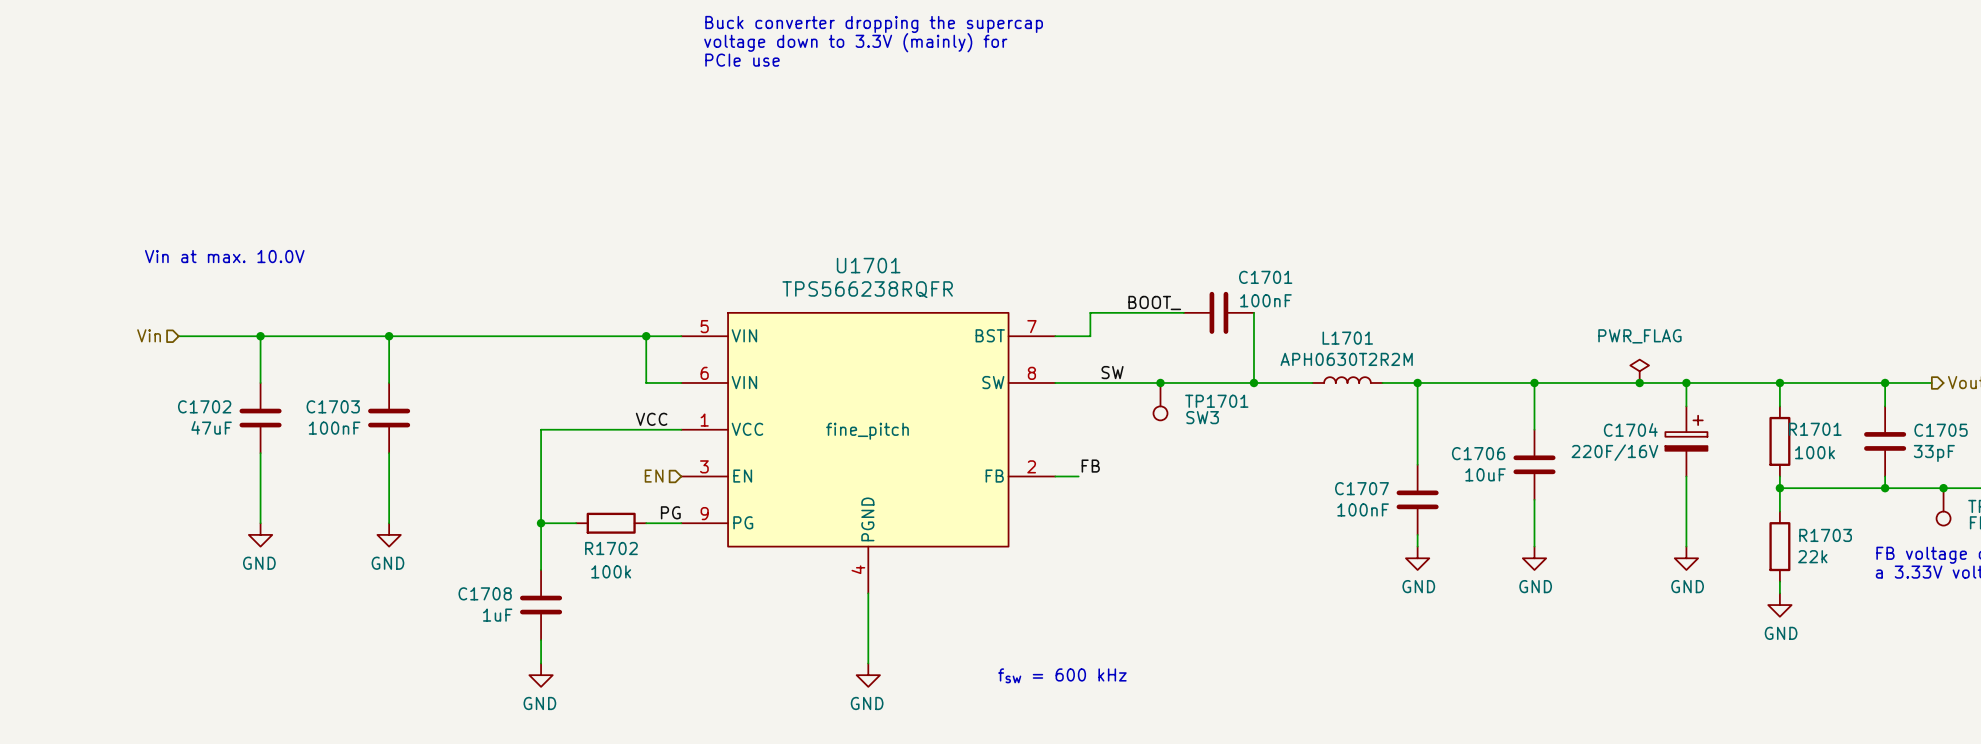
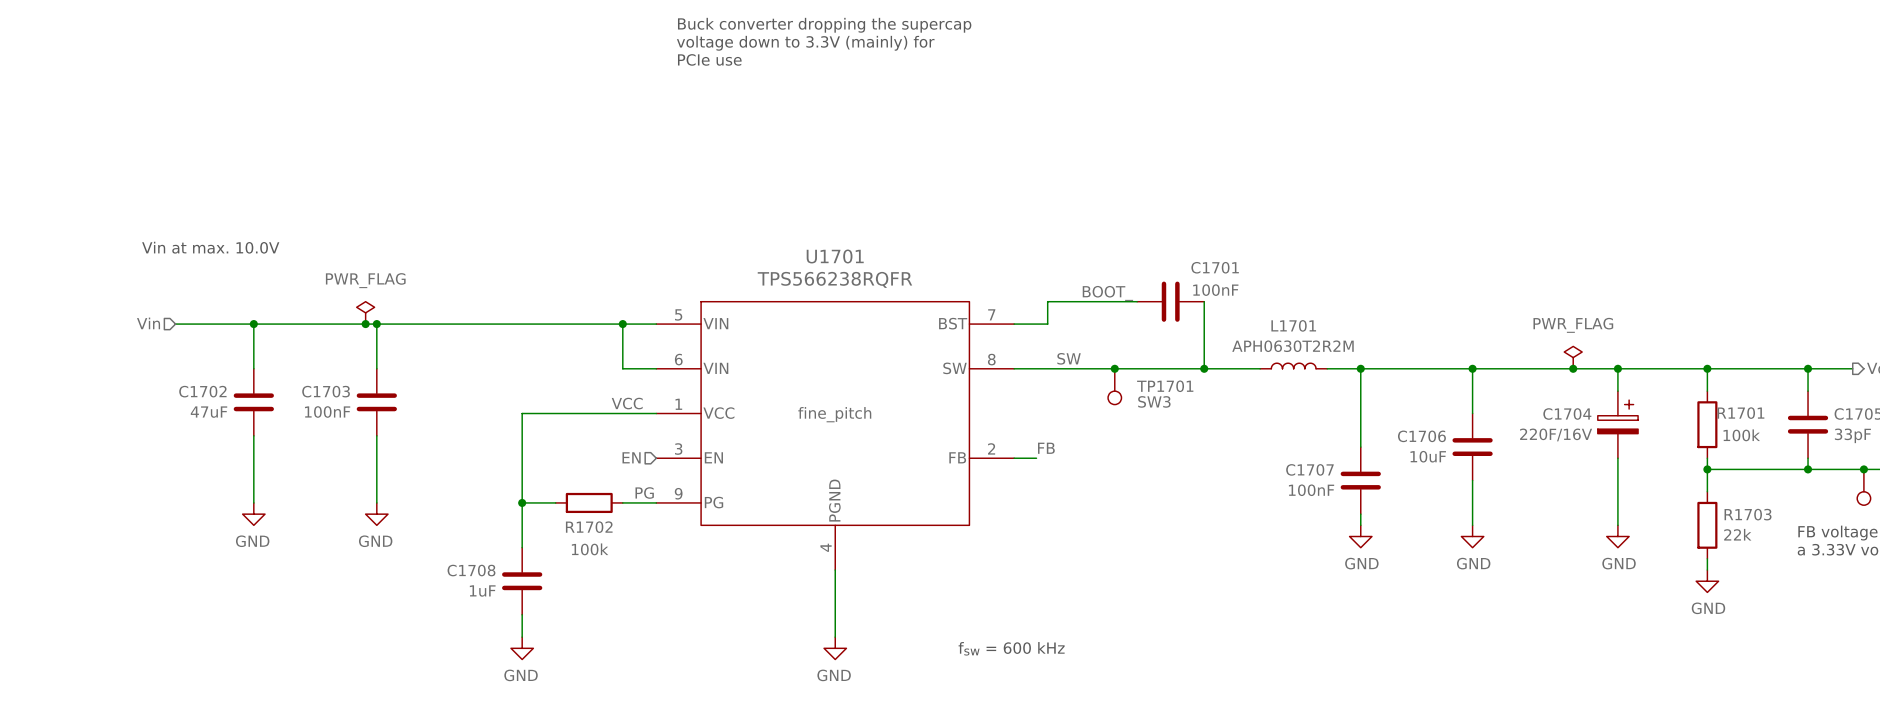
power symbol: none -> PWR_FLAG (365, 312)
junction: none -> (365, 324)

